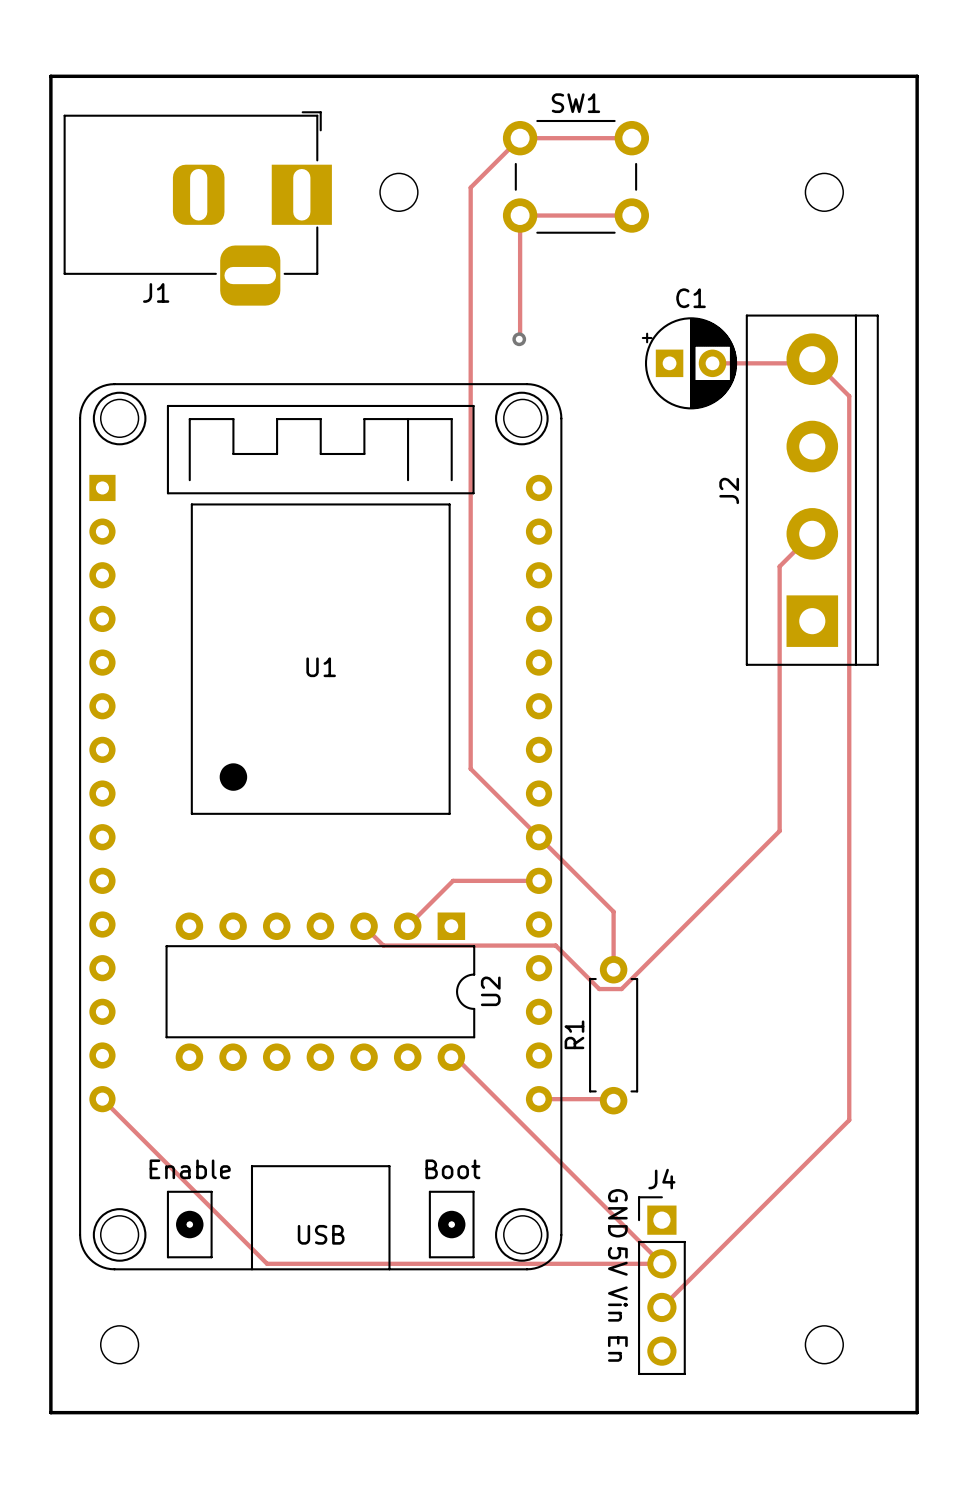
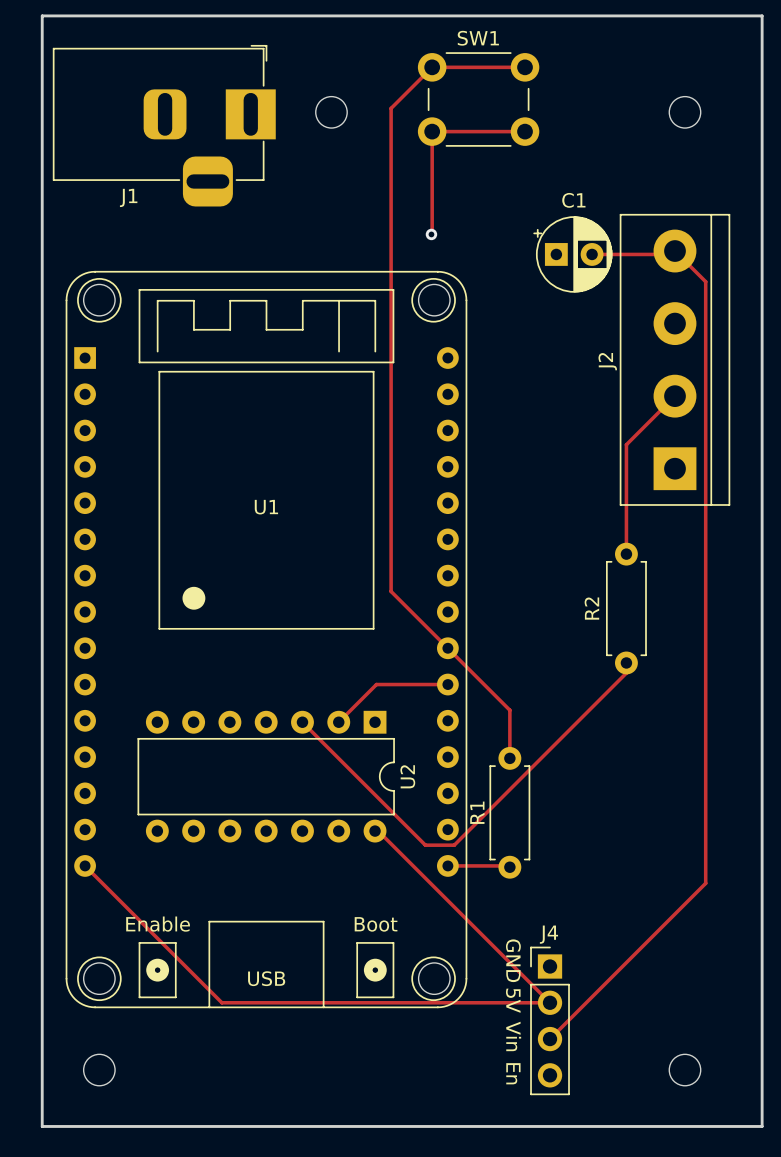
track: (779, 566) (779, 831) (621, 989) (599, 989) (555, 945) (383, 945) -> (626, 662) (626, 673) (454, 845) (425, 845) (318, 738)
track: none -> (647, 423) (626, 444) (626, 554)
R2: none -> (626, 608)

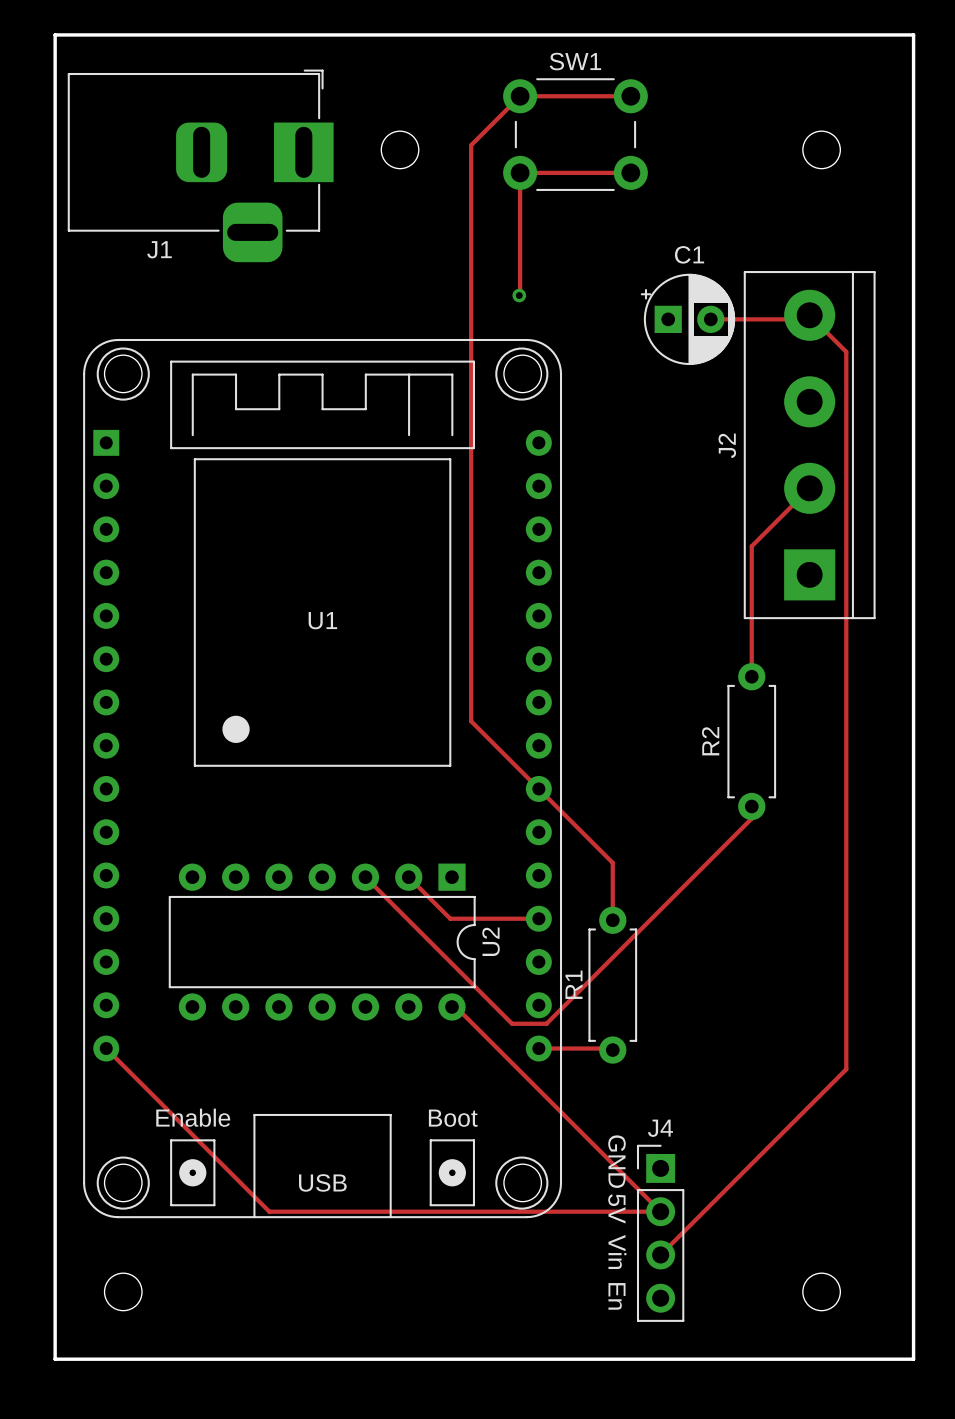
track: (447, 684) (376, 684) (338, 722) -> (538, 918) (450, 918) (408, 877)

